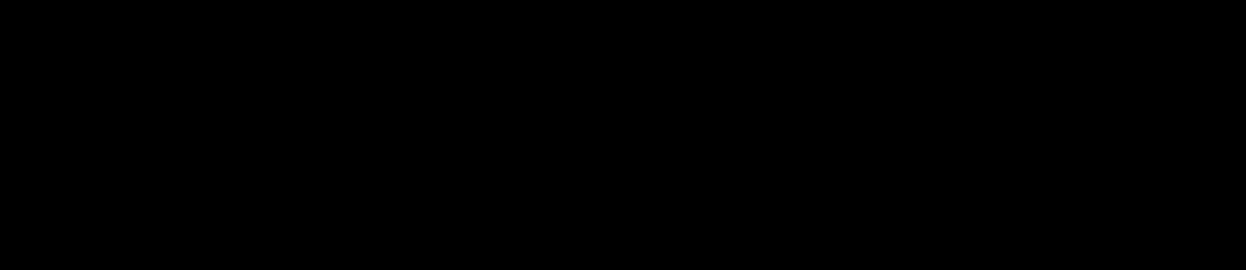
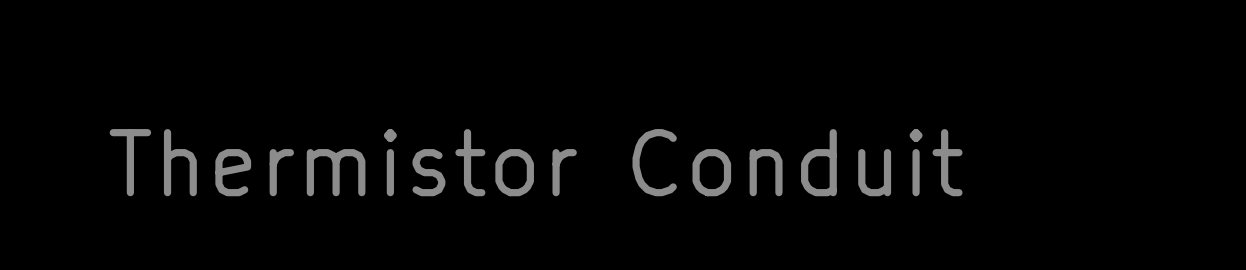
text: none -> Thermistor Conduit (536, 162)

